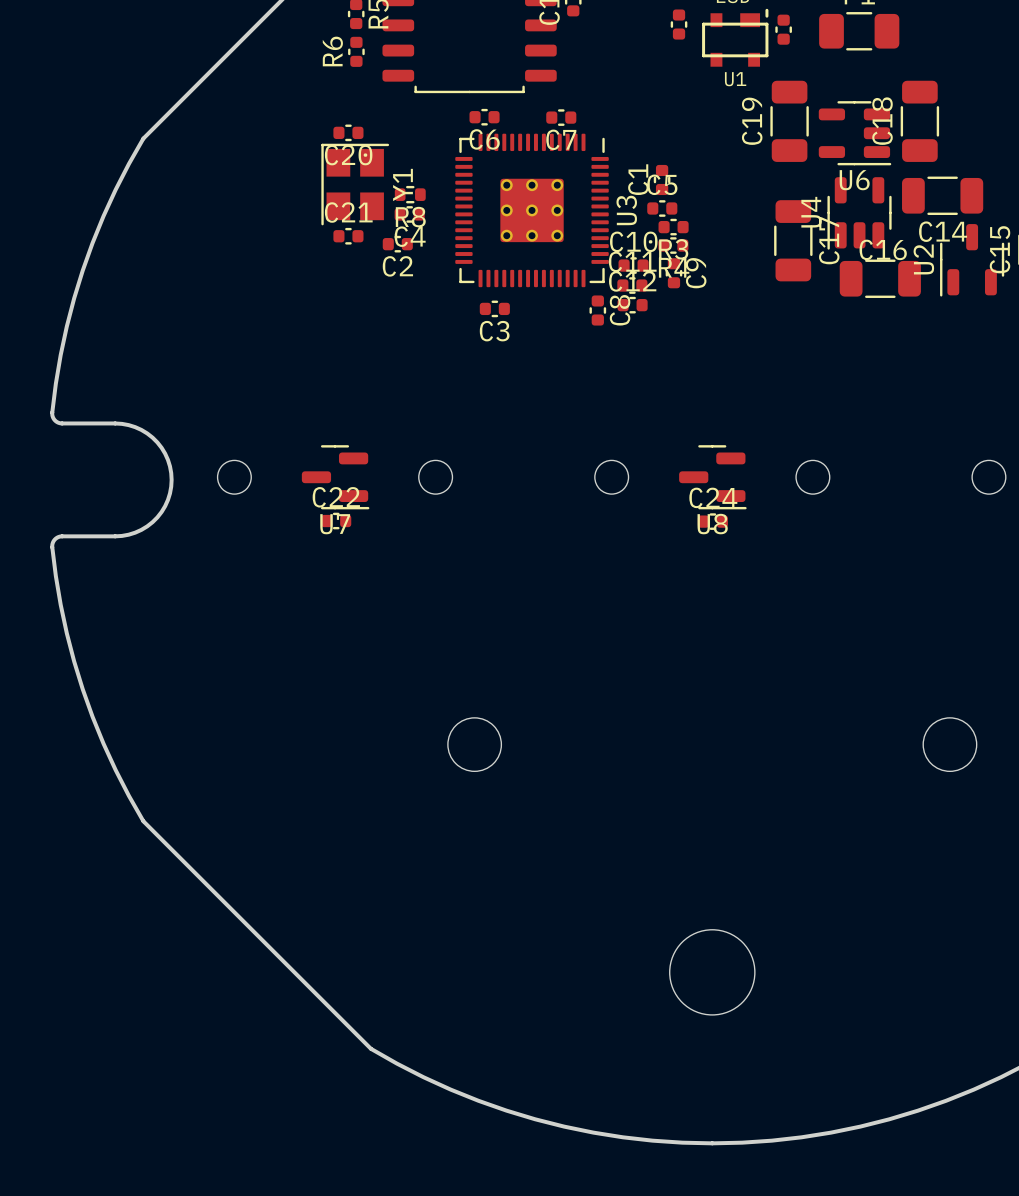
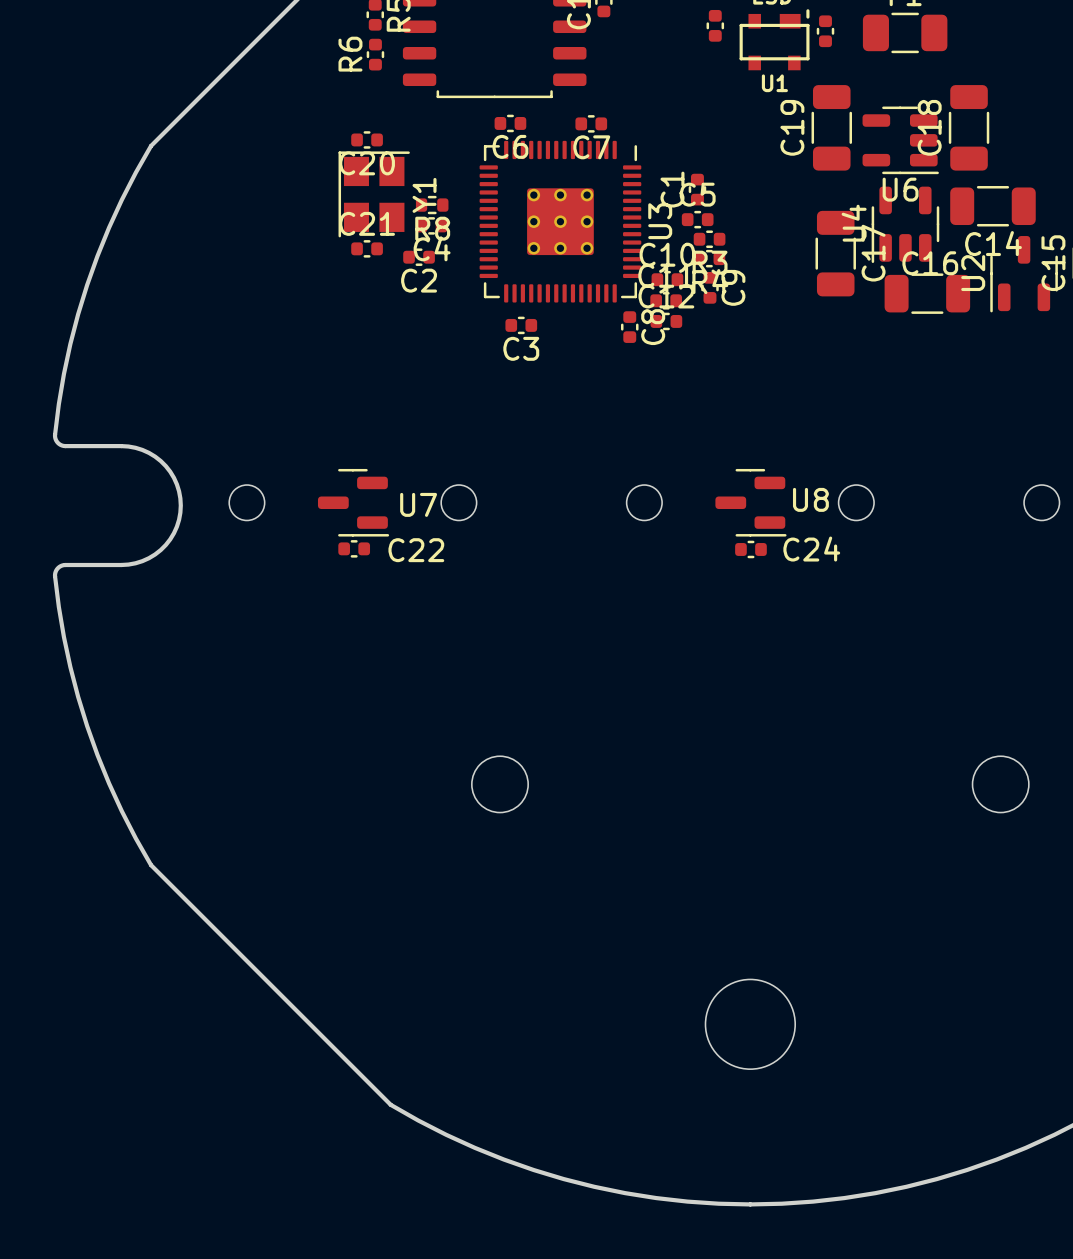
C22 name position: C22 (336, 497) -> C22 (416, 550)
C24 name position: C24 (713, 497) -> C24 (811, 549)
U7 name position: U7 (335, 524) -> U7 (418, 504)
U8 name position: U8 (712, 524) -> U8 (810, 499)

